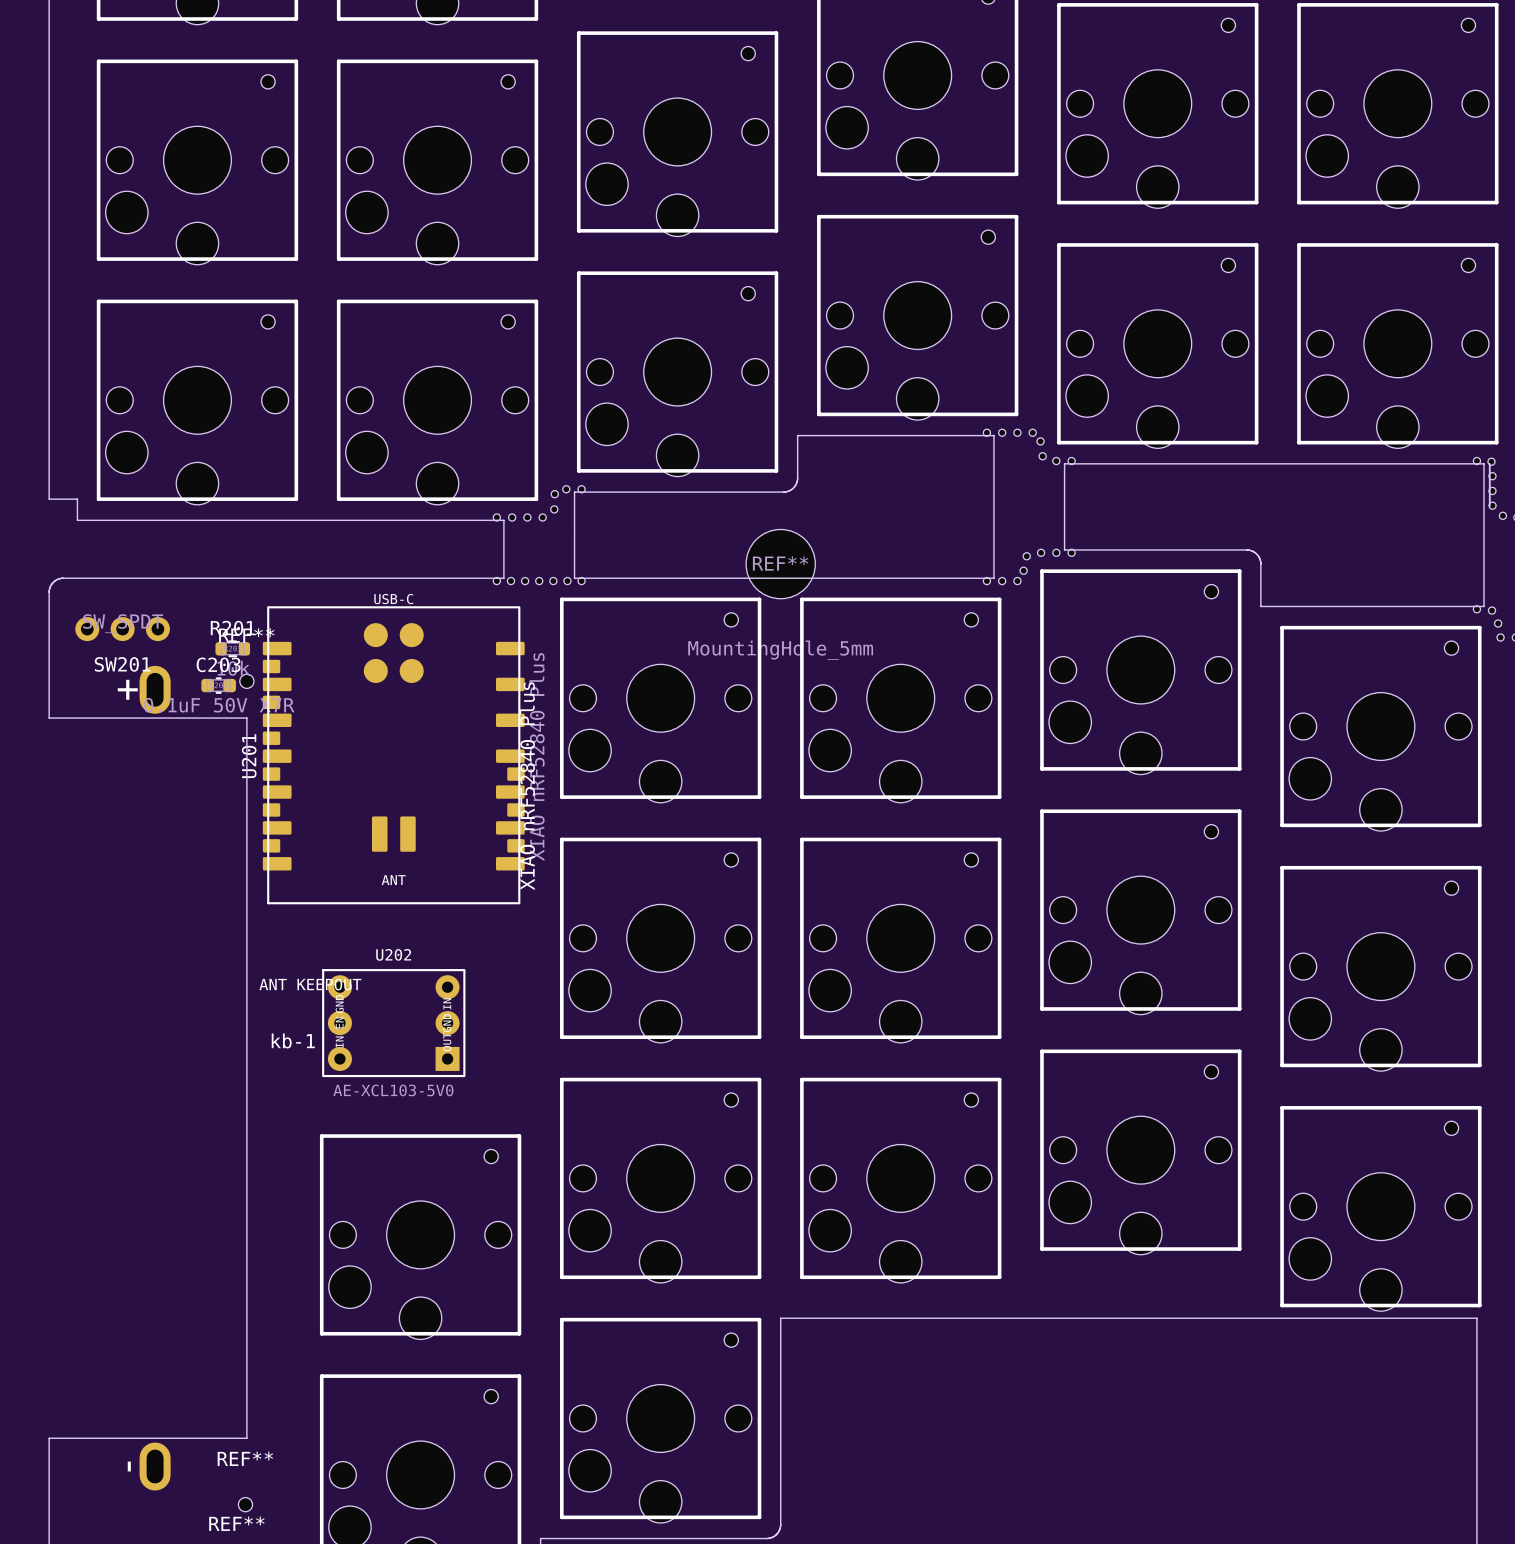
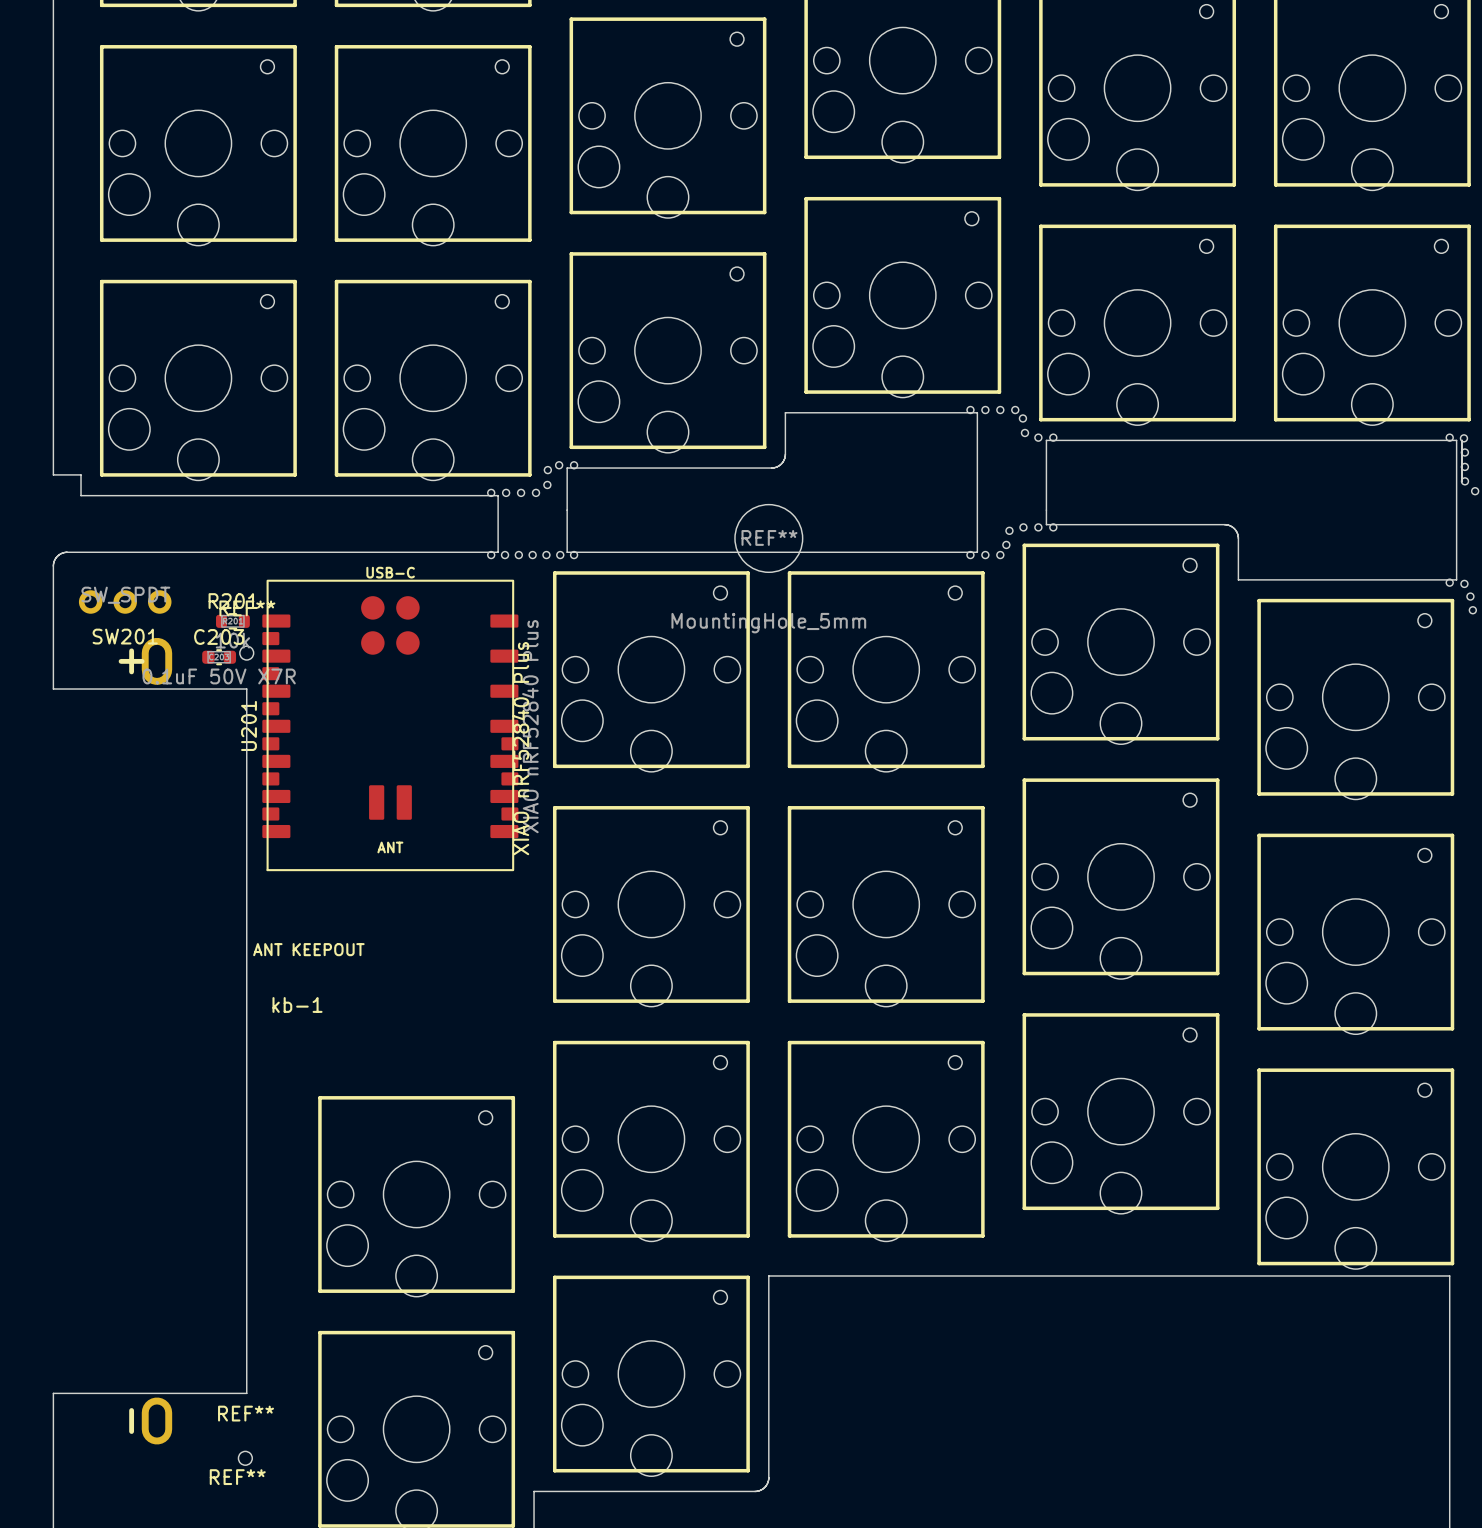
text: U202 (393, 954) -> none
part: AE-XCL103-5V0 (393, 1023) -> none

